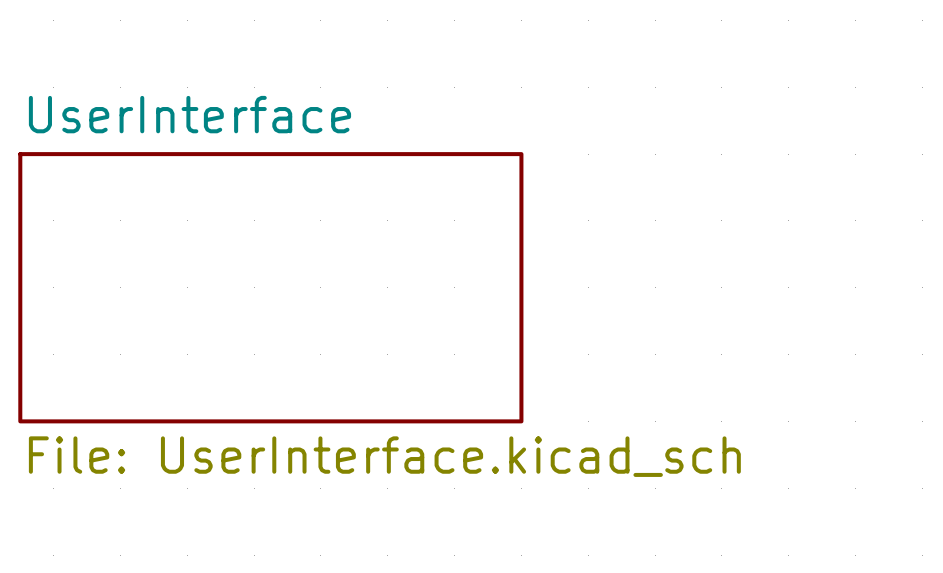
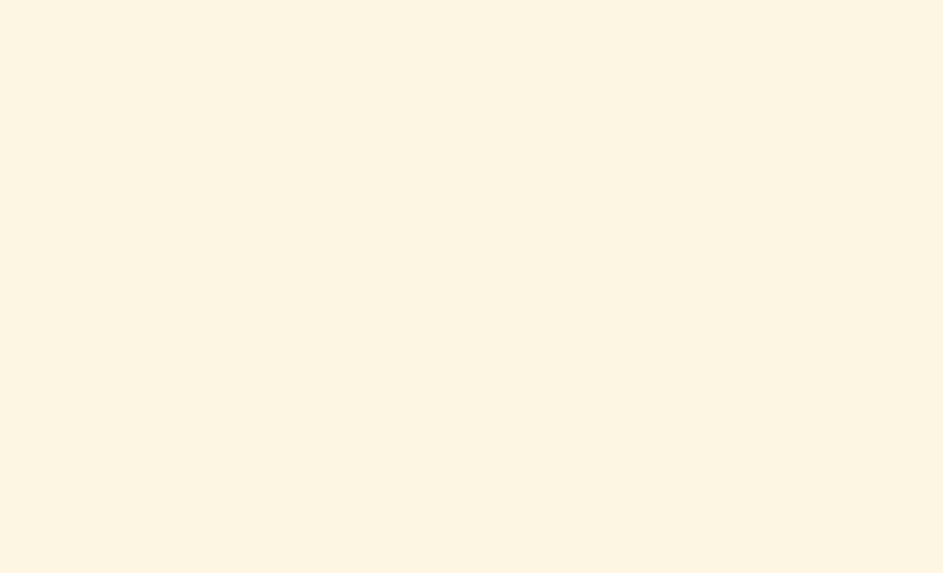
sheet UserInterface: File: UserInterface.kicad_sch (270, 287) -> none

